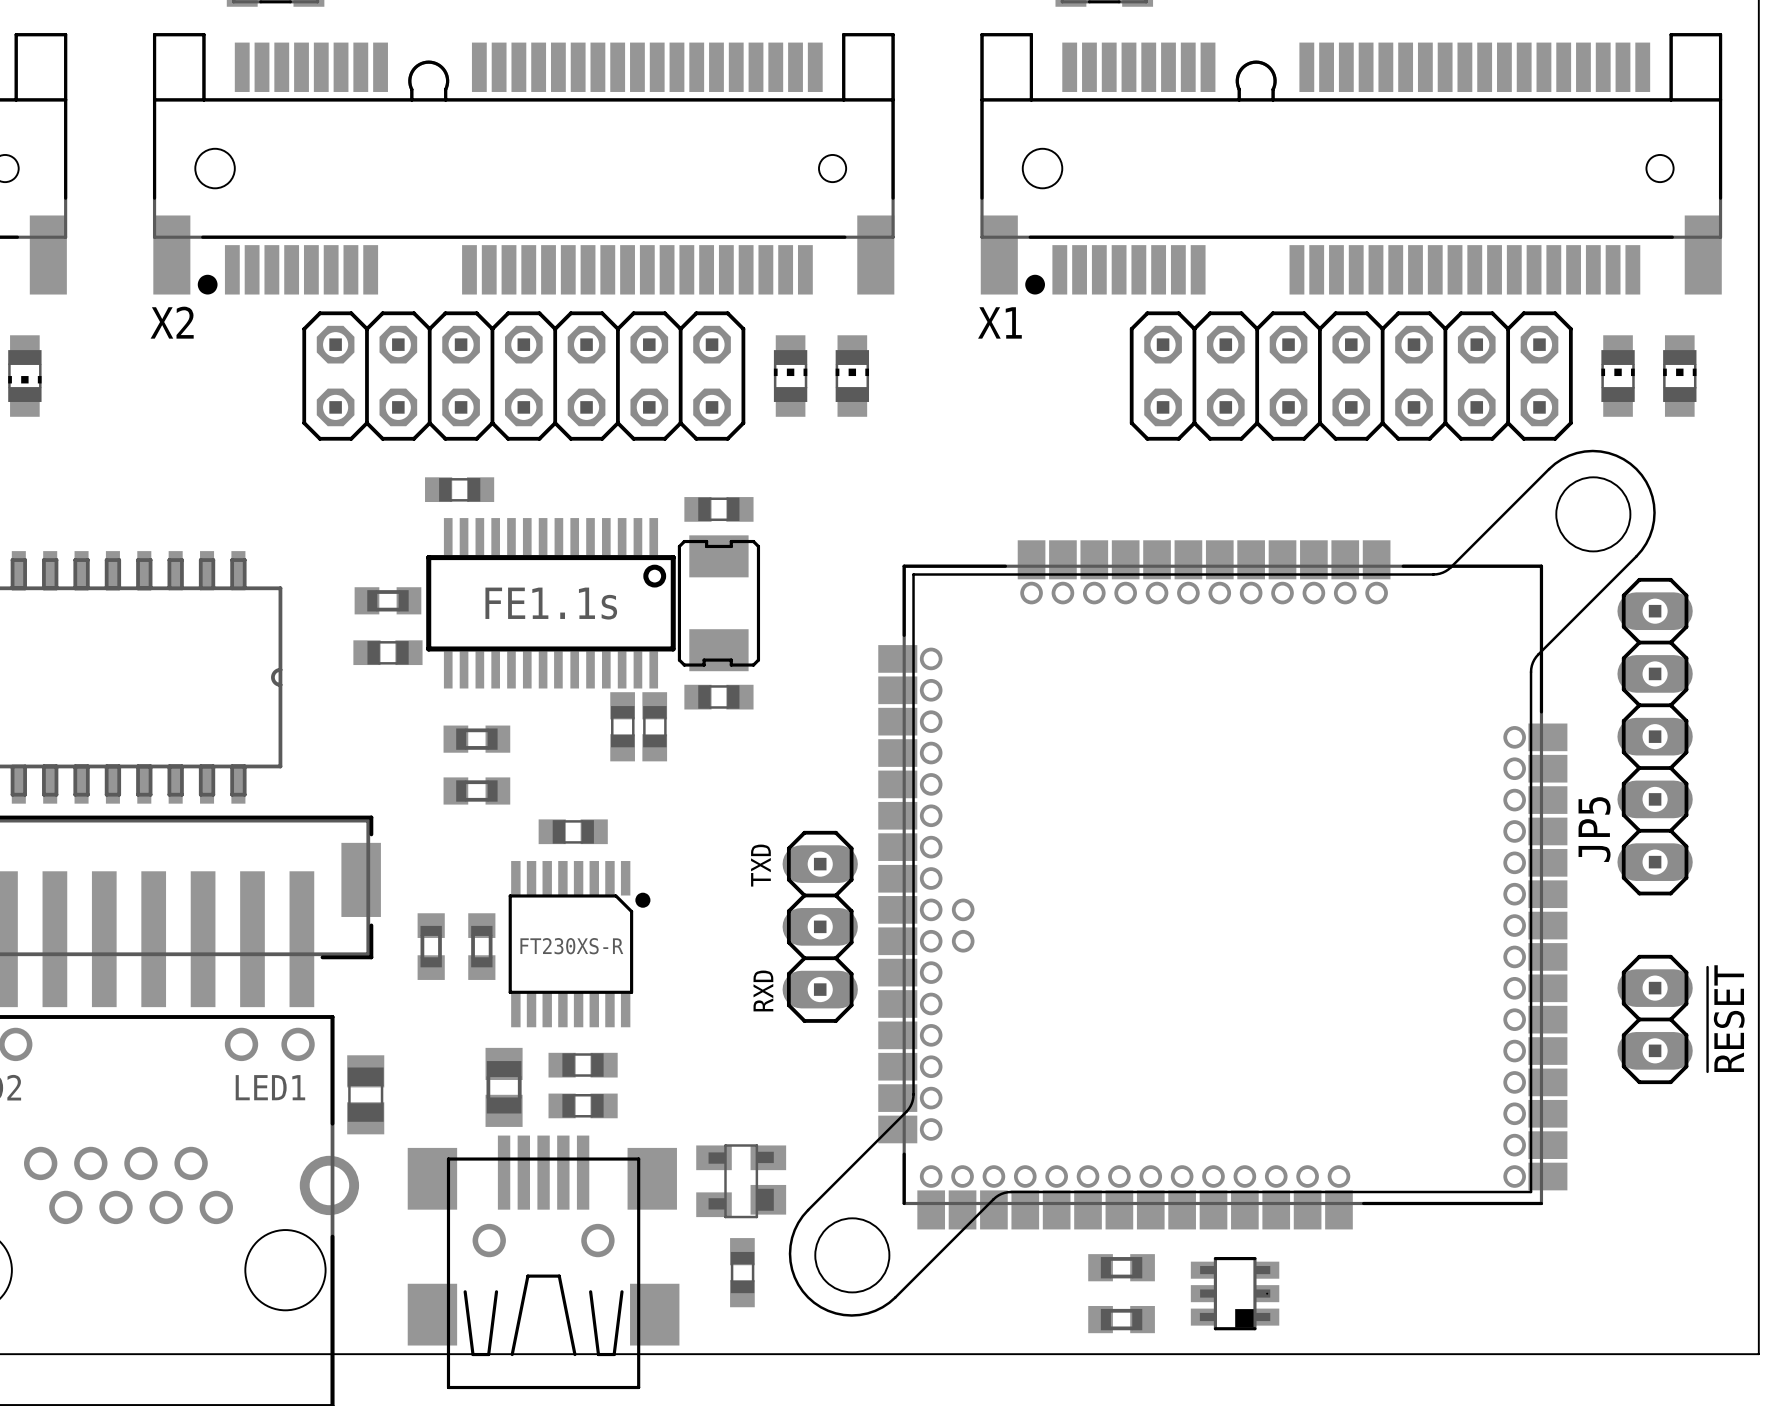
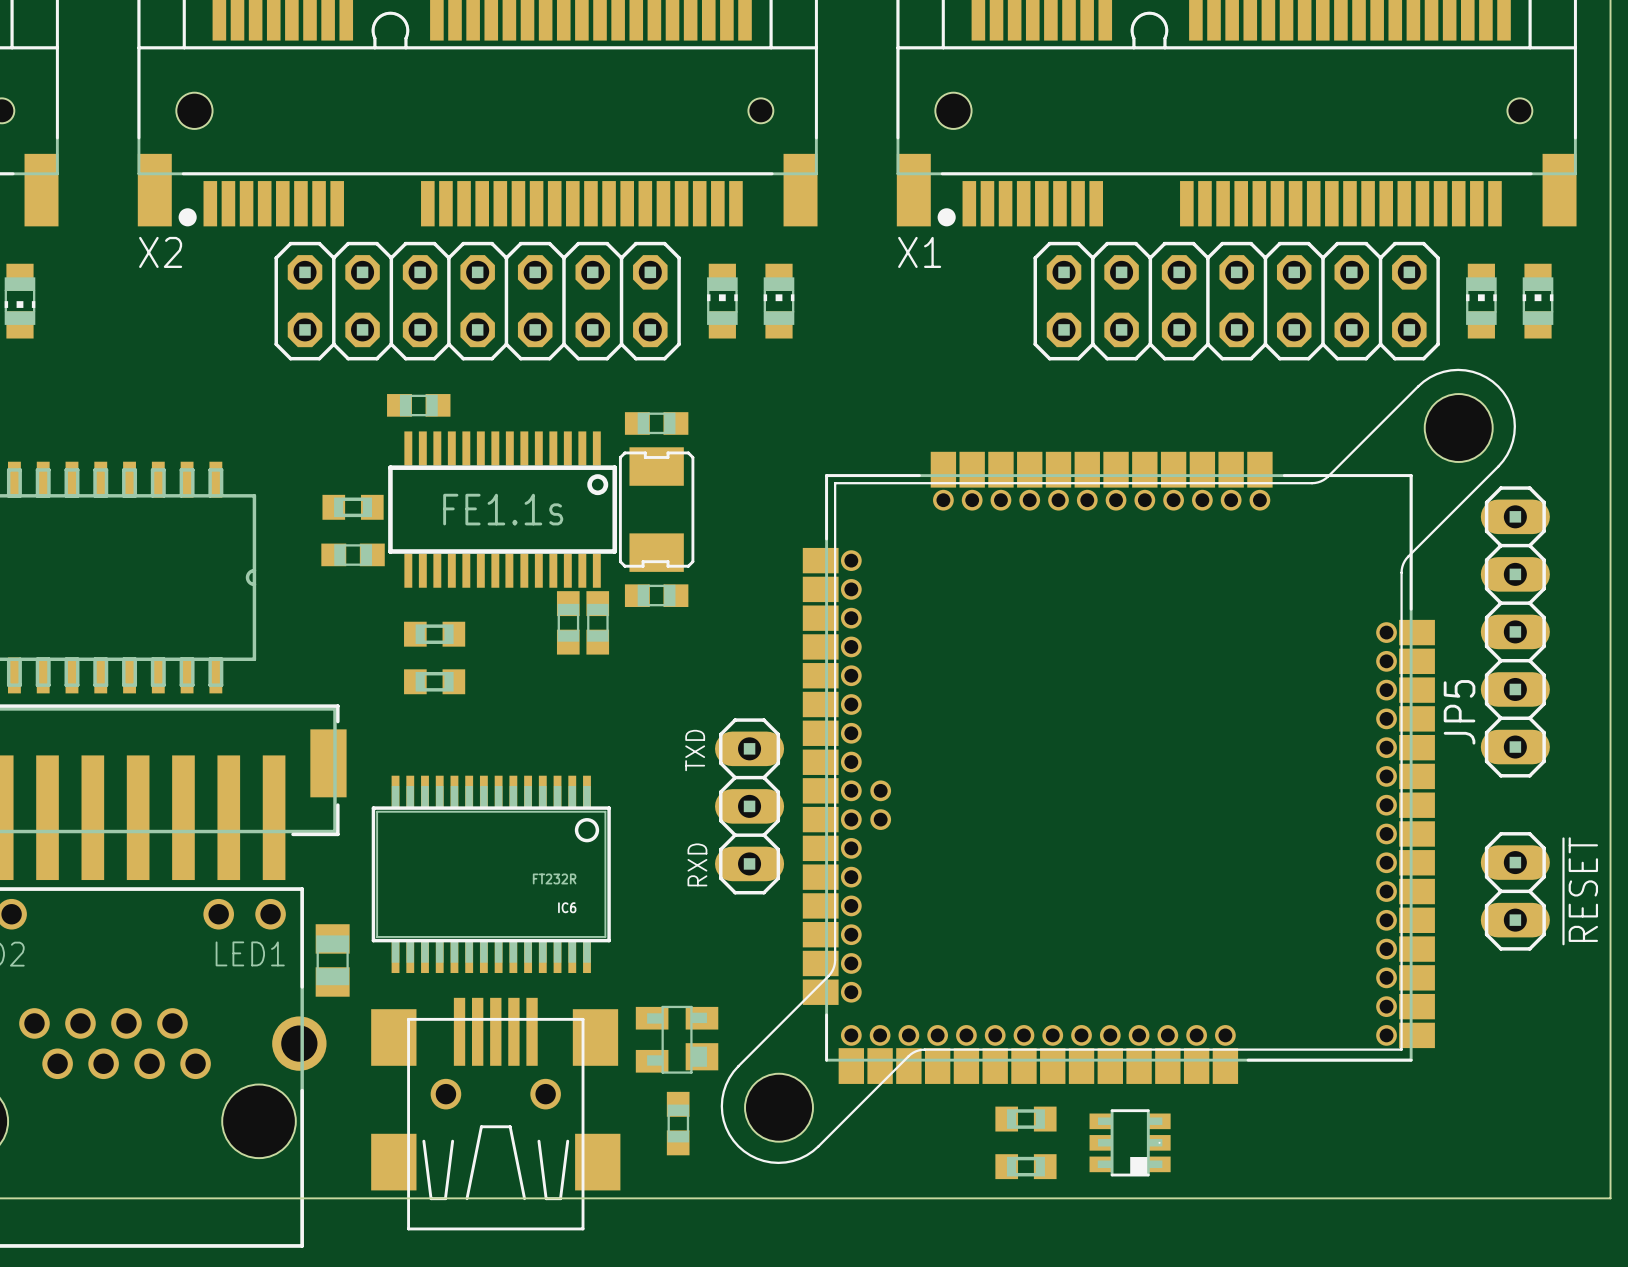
part: (573, 831) -> none
part: FT230XS-R (579, 944) -> none
part: (431, 946) -> none
part: (481, 946) -> none
IC6: none -> FT232R (491, 874)
part: (583, 1065) -> none
part: (504, 1087) -> none
part: (583, 1105) -> none

